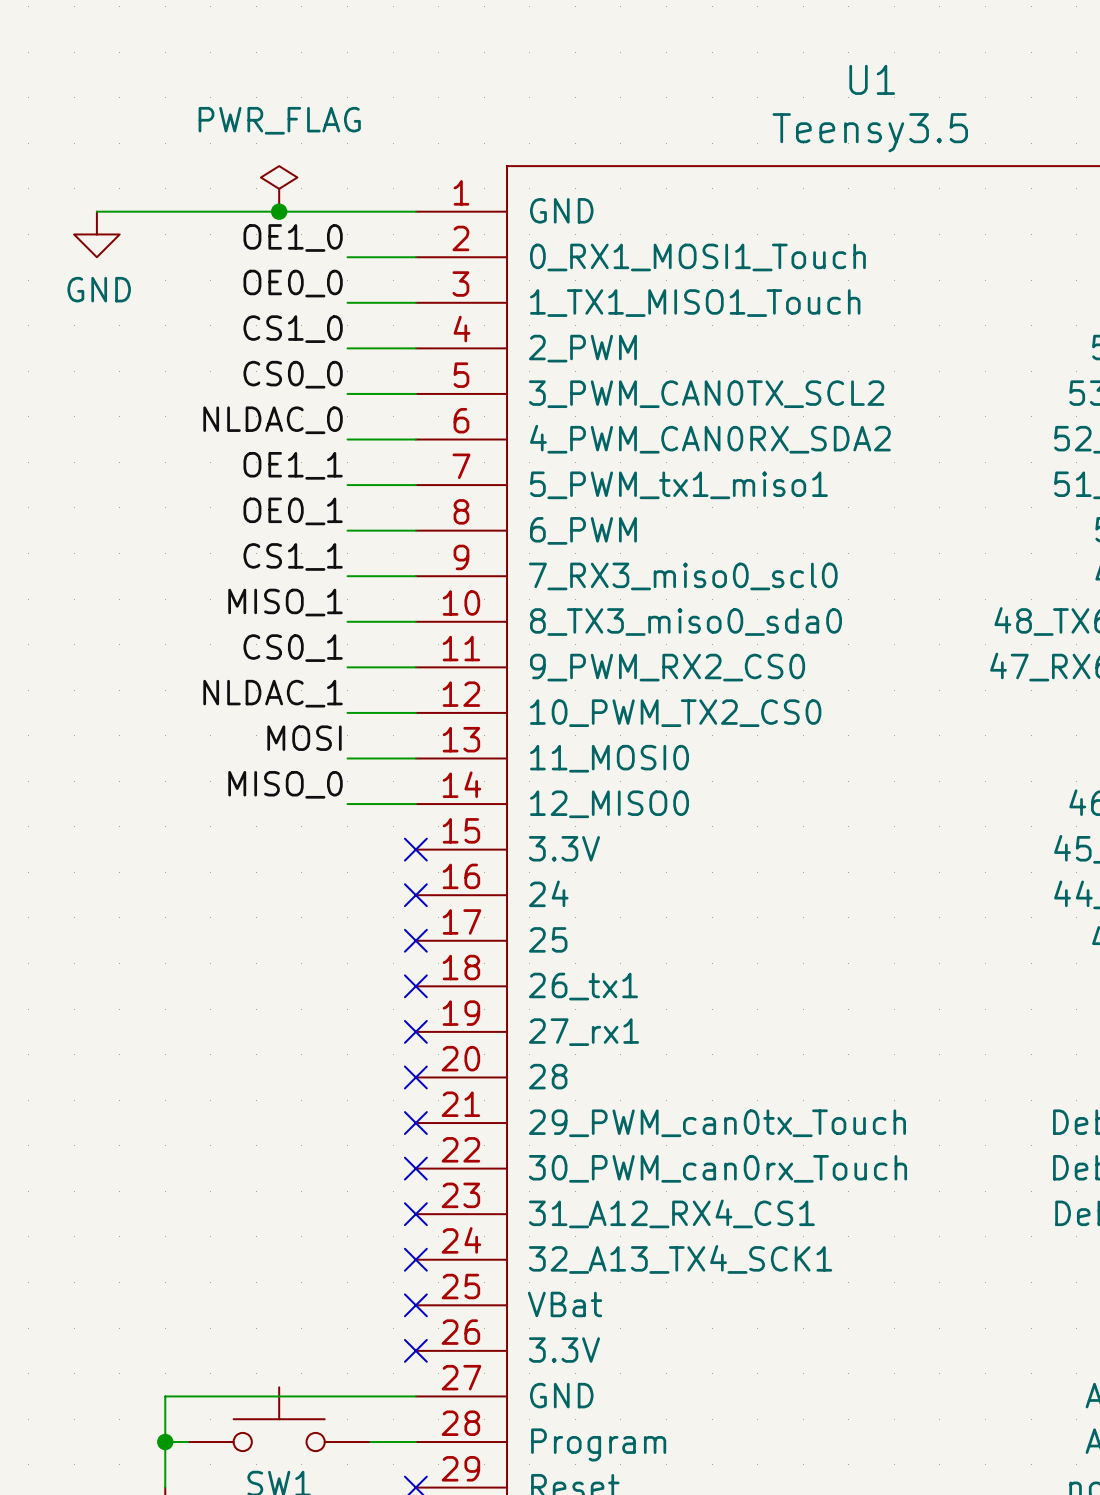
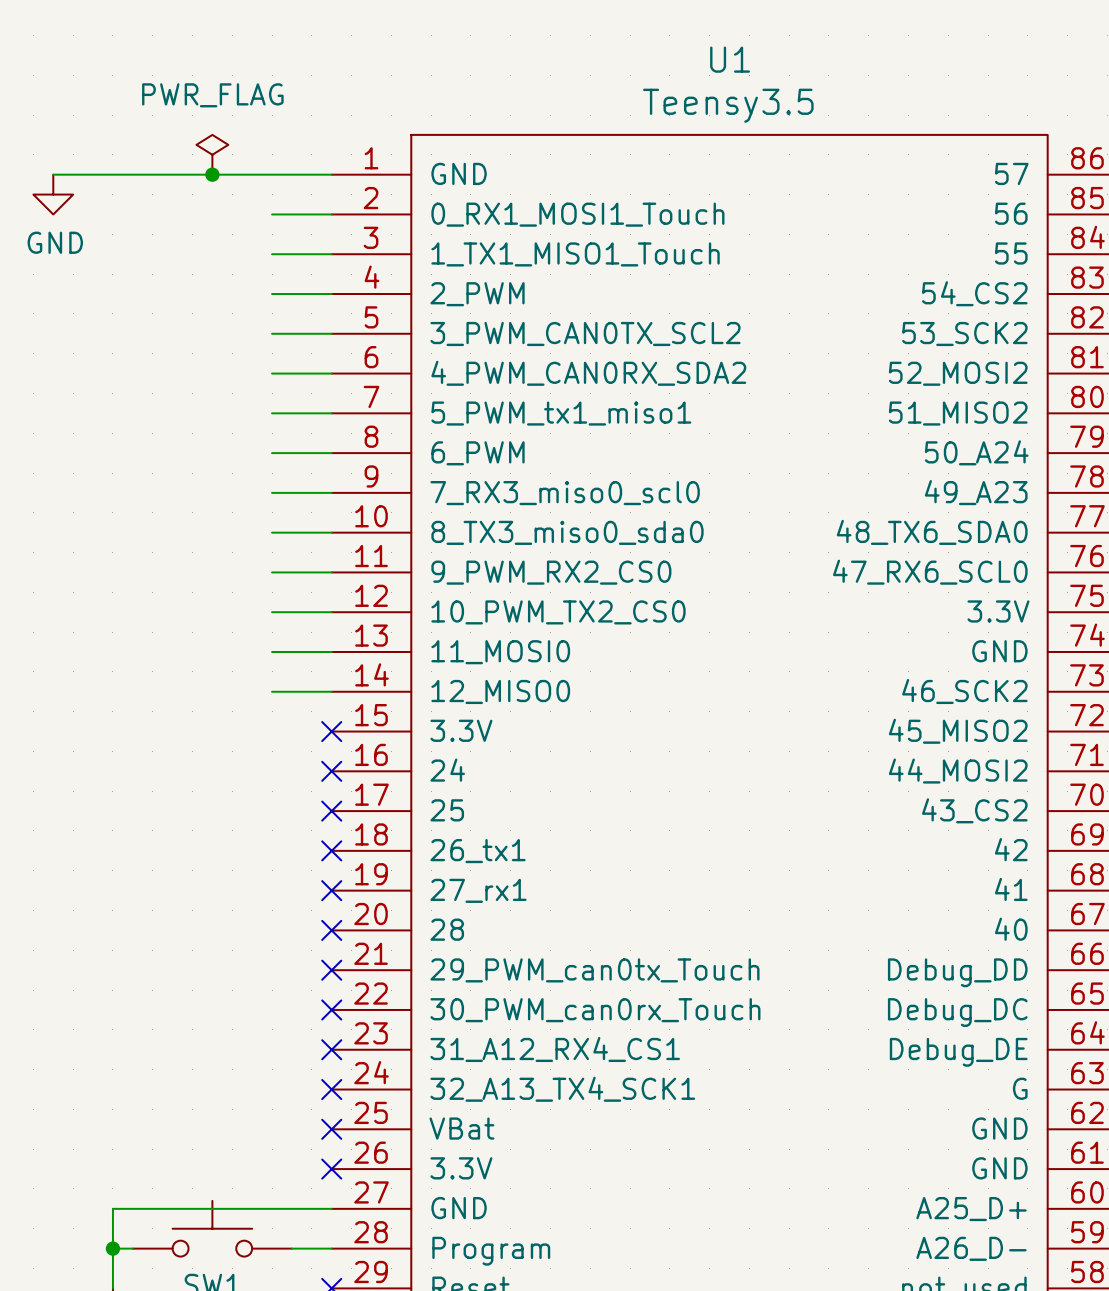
label: OE1_0 (293, 237) -> none
label: OE0_0 (293, 283) -> none
label: CS1_0 (293, 329) -> none
label: CS0_0 (293, 374) -> none
label: NLDAC_0 (273, 420) -> none
label: OE1_1 (293, 465) -> none
label: OE0_1 (293, 511) -> none
label: CS1_1 (293, 556) -> none
label: MISO_1 (285, 602) -> none
label: CS0_1 (293, 648) -> none
label: NLDAC_1 (273, 693) -> none
label: MOSI (304, 738) -> none
label: MISO_0 (285, 784) -> none

